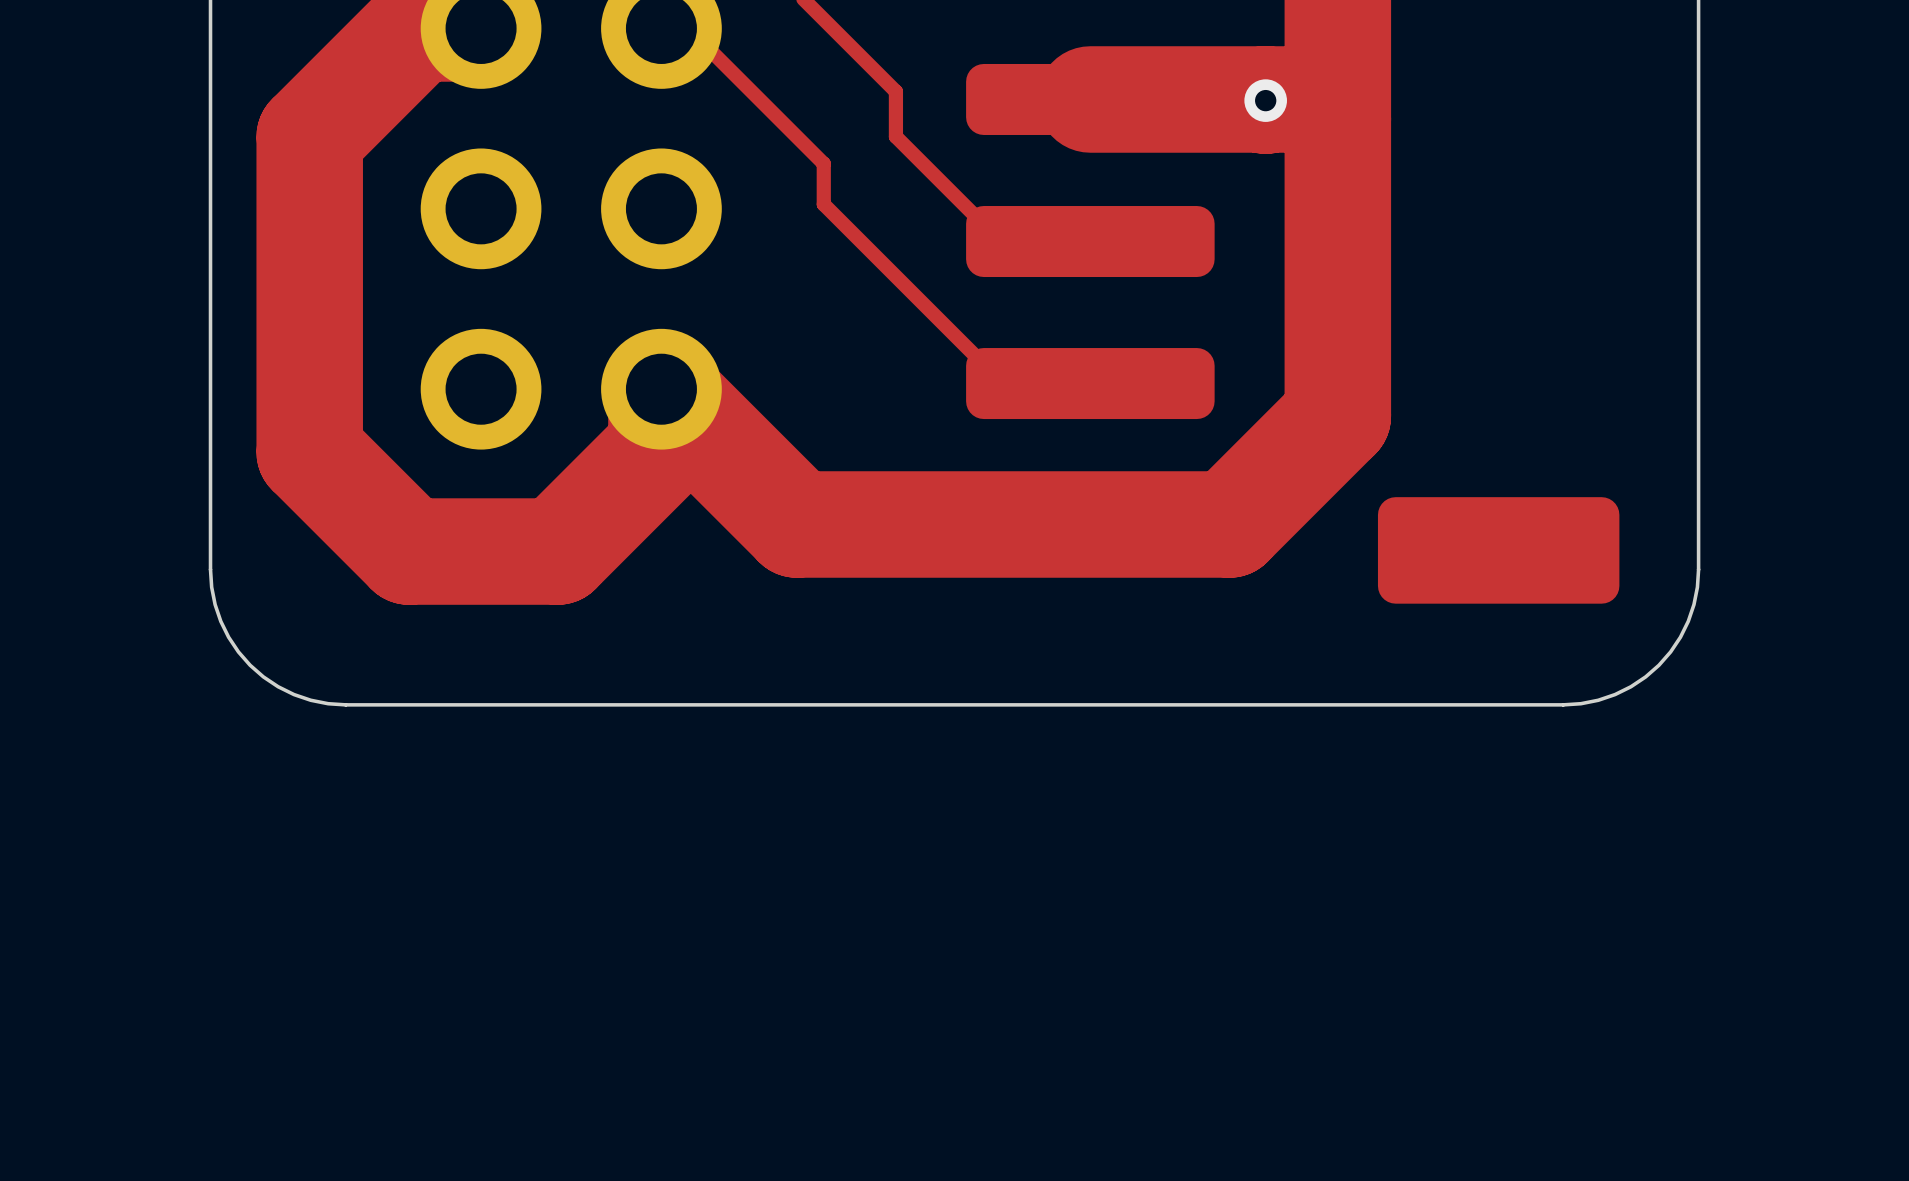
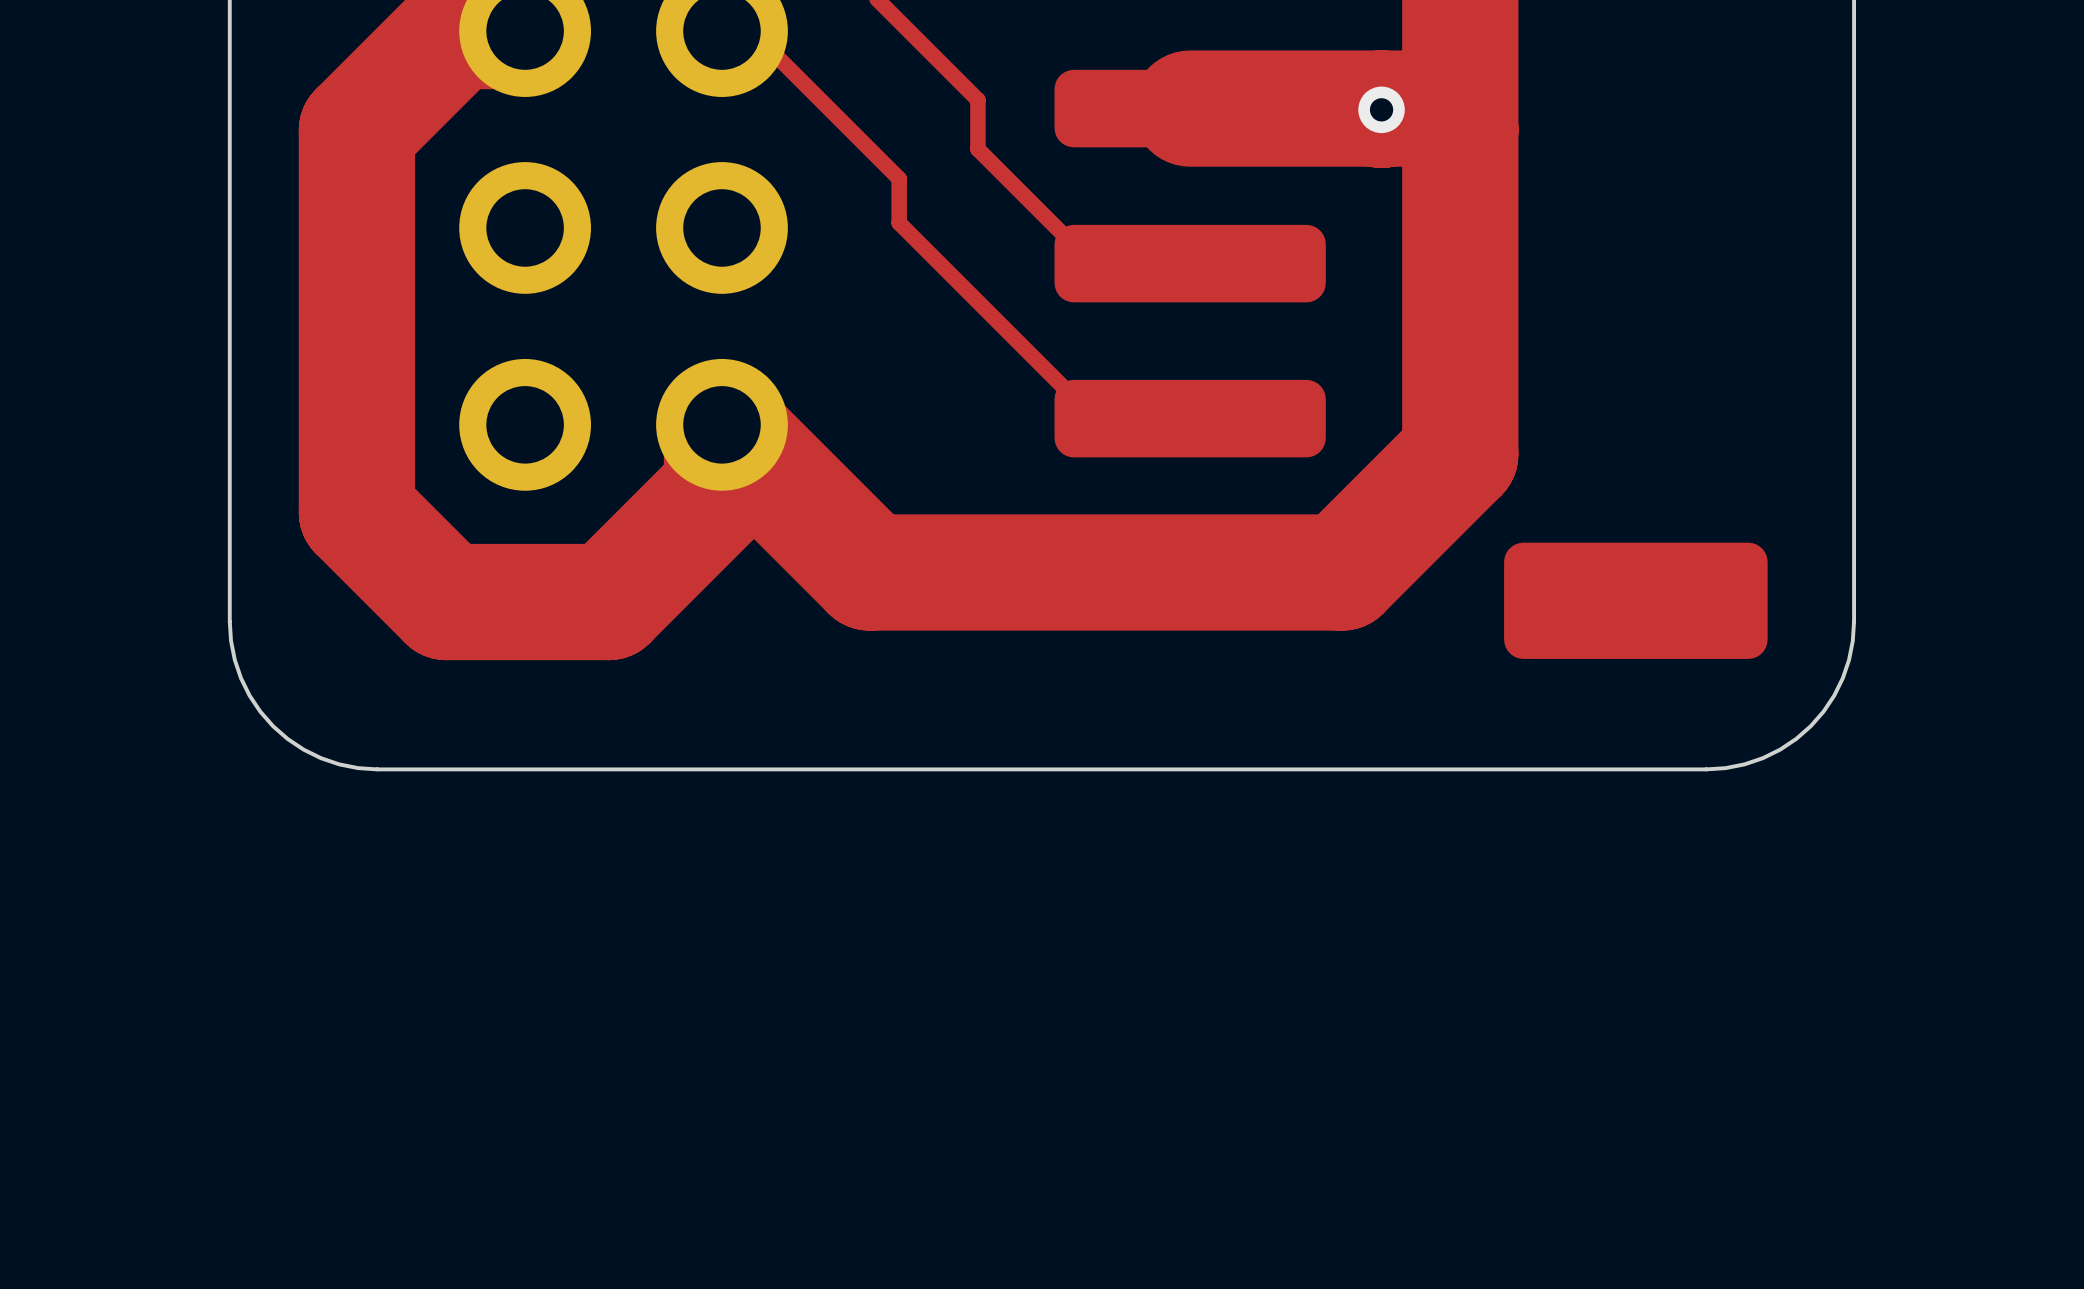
top track: (326, 119) (309, 136) (309, 452) (326, 469) -> (356, 130) (356, 512)

